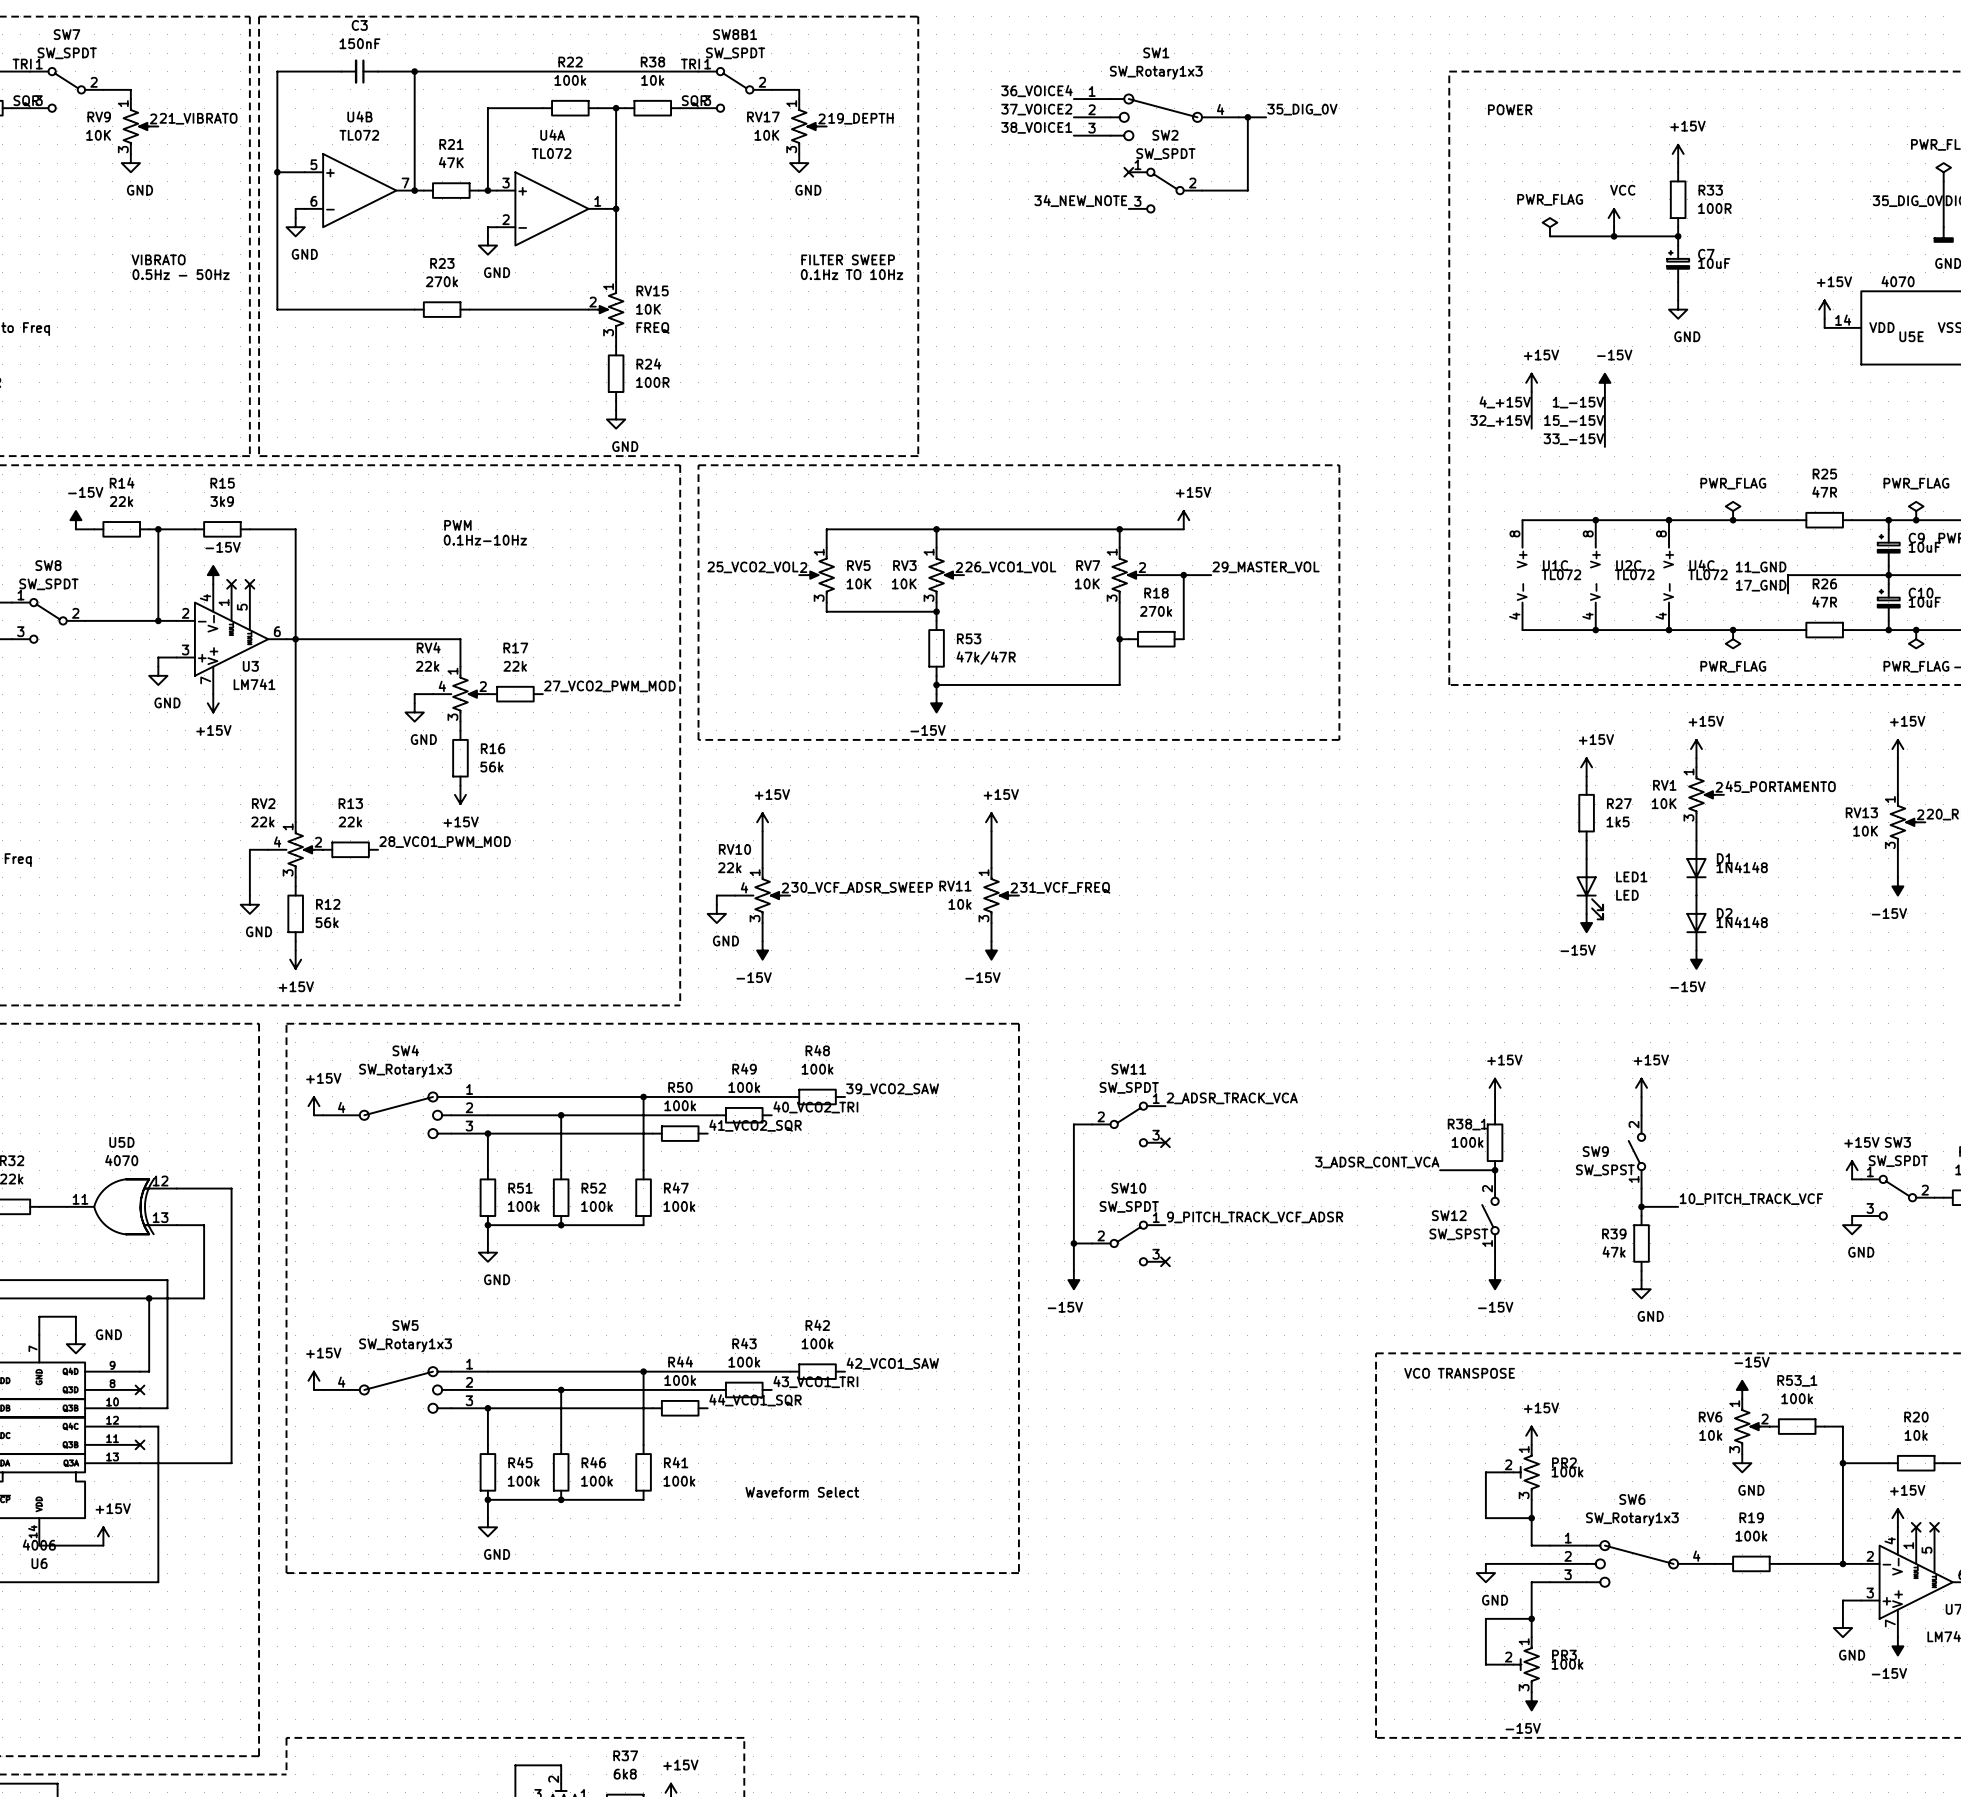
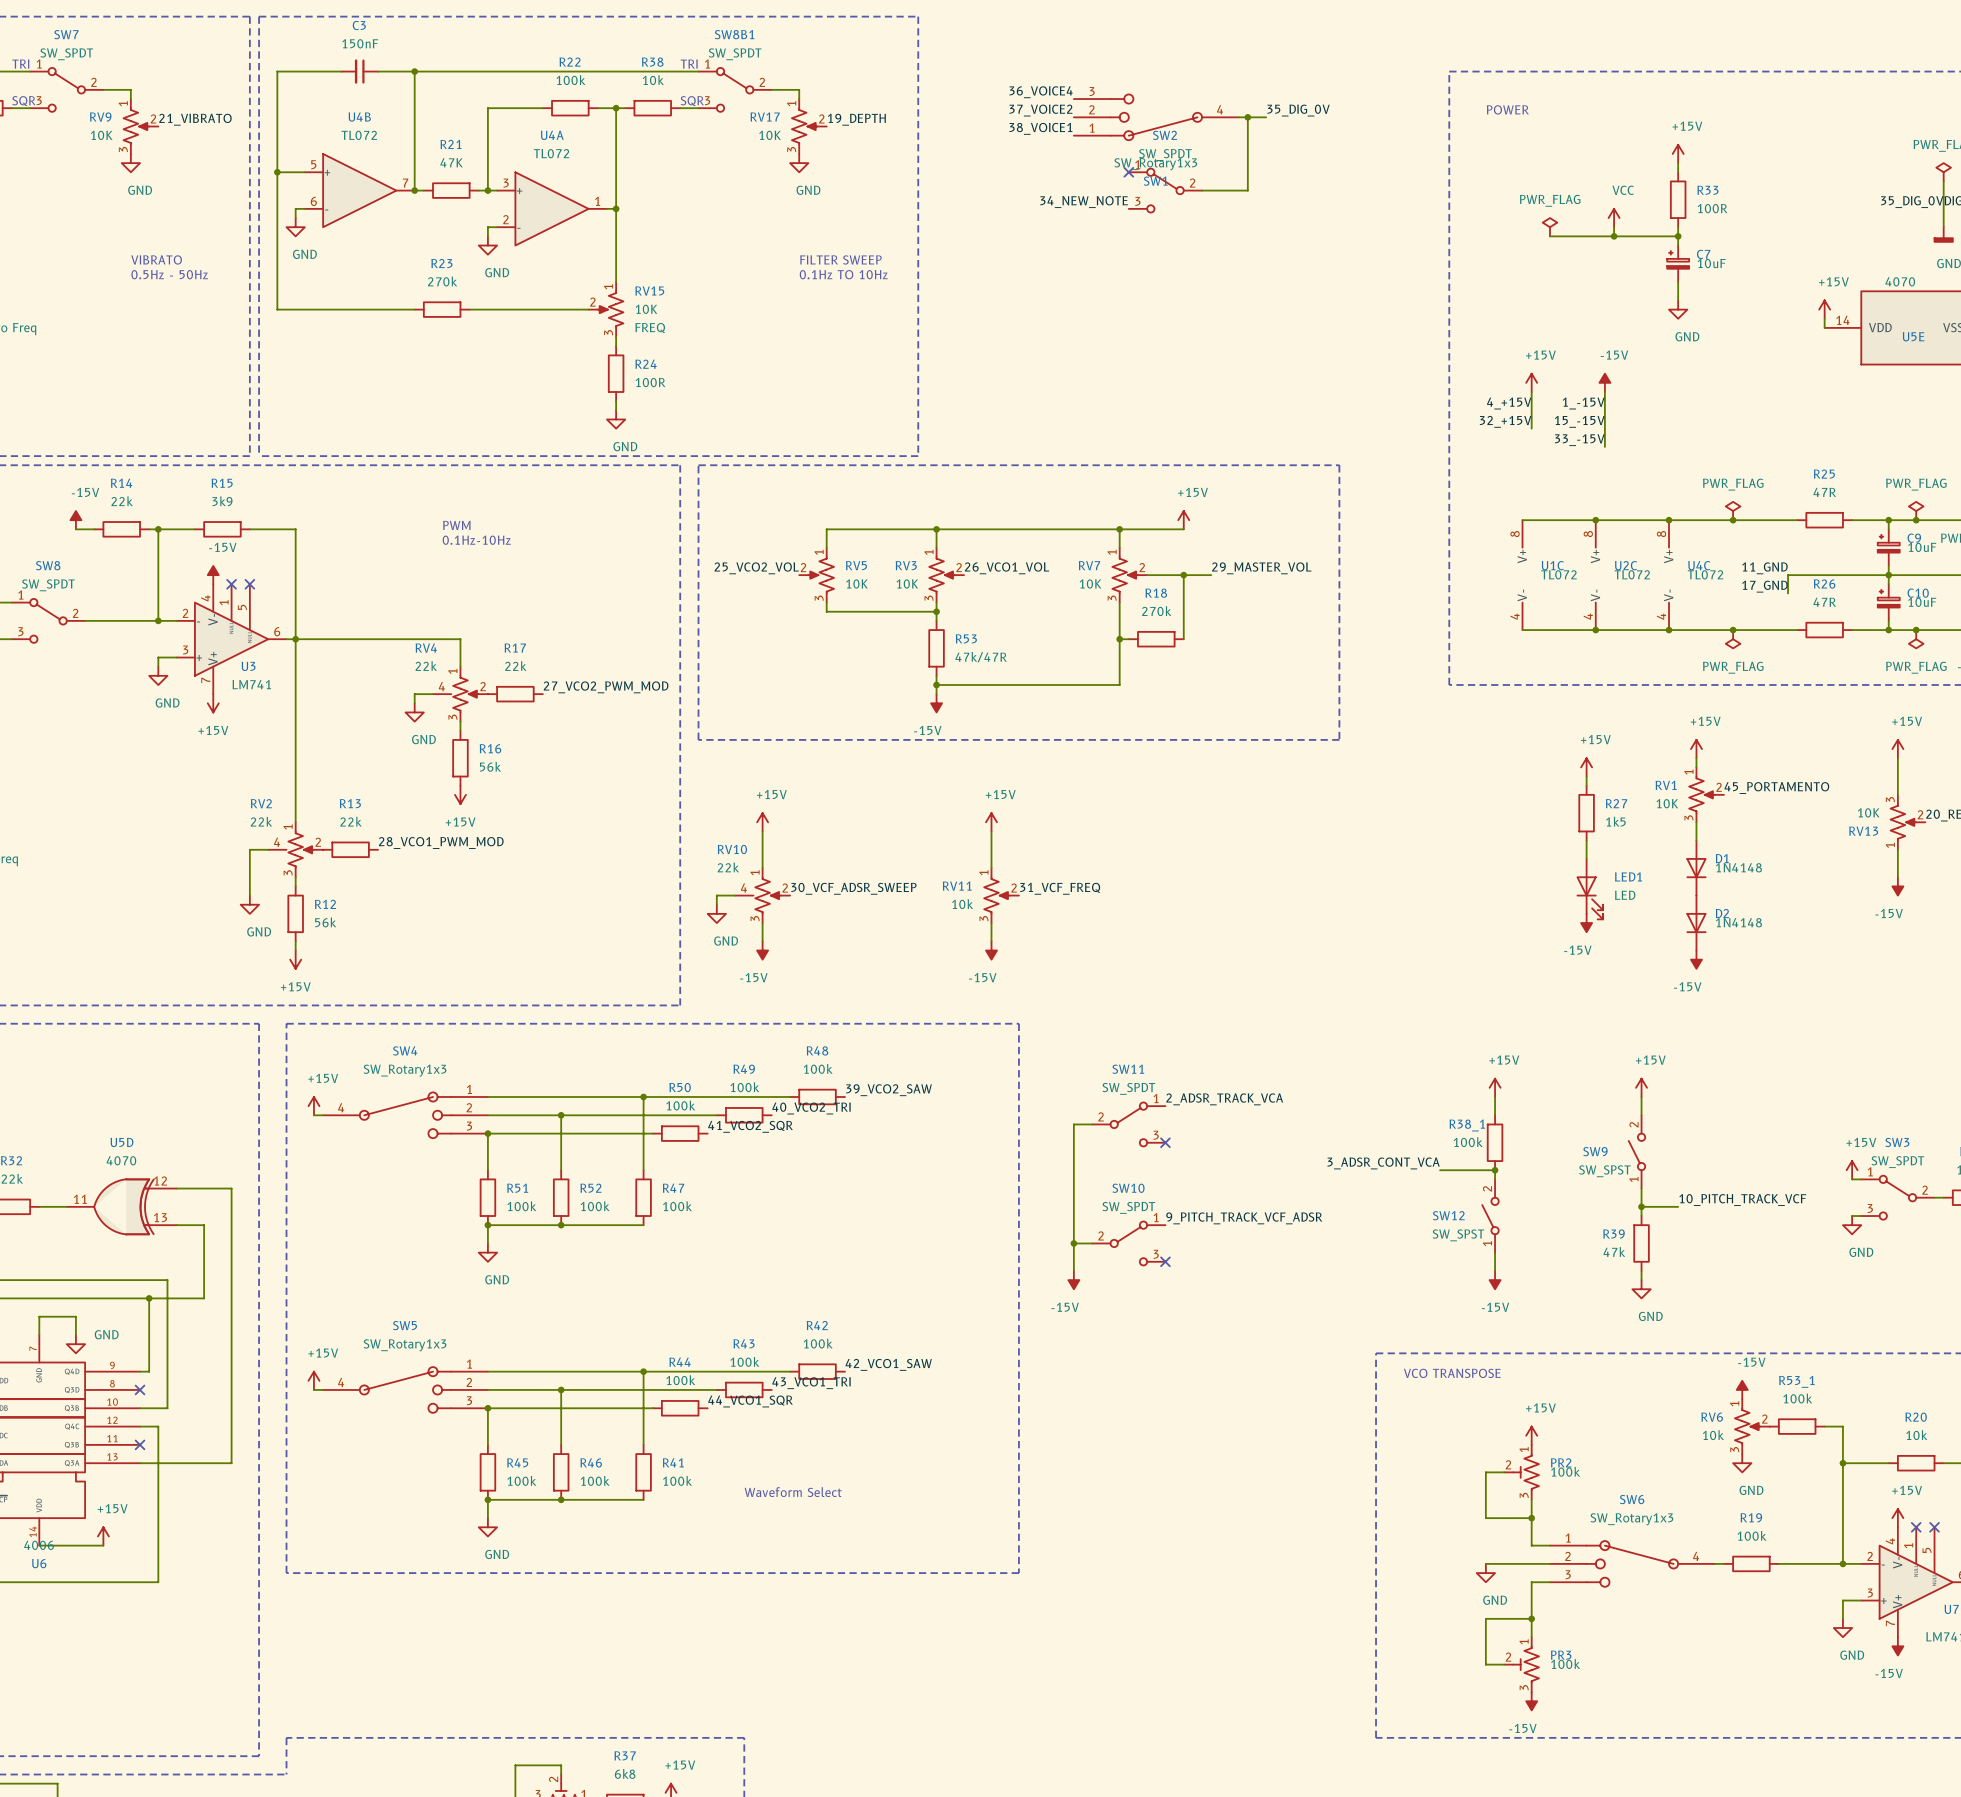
SW1 flip: as is (1156, 117) -> up-down (1156, 117)
RV13 flip: as is (1903, 822) -> up-down (1903, 822)

